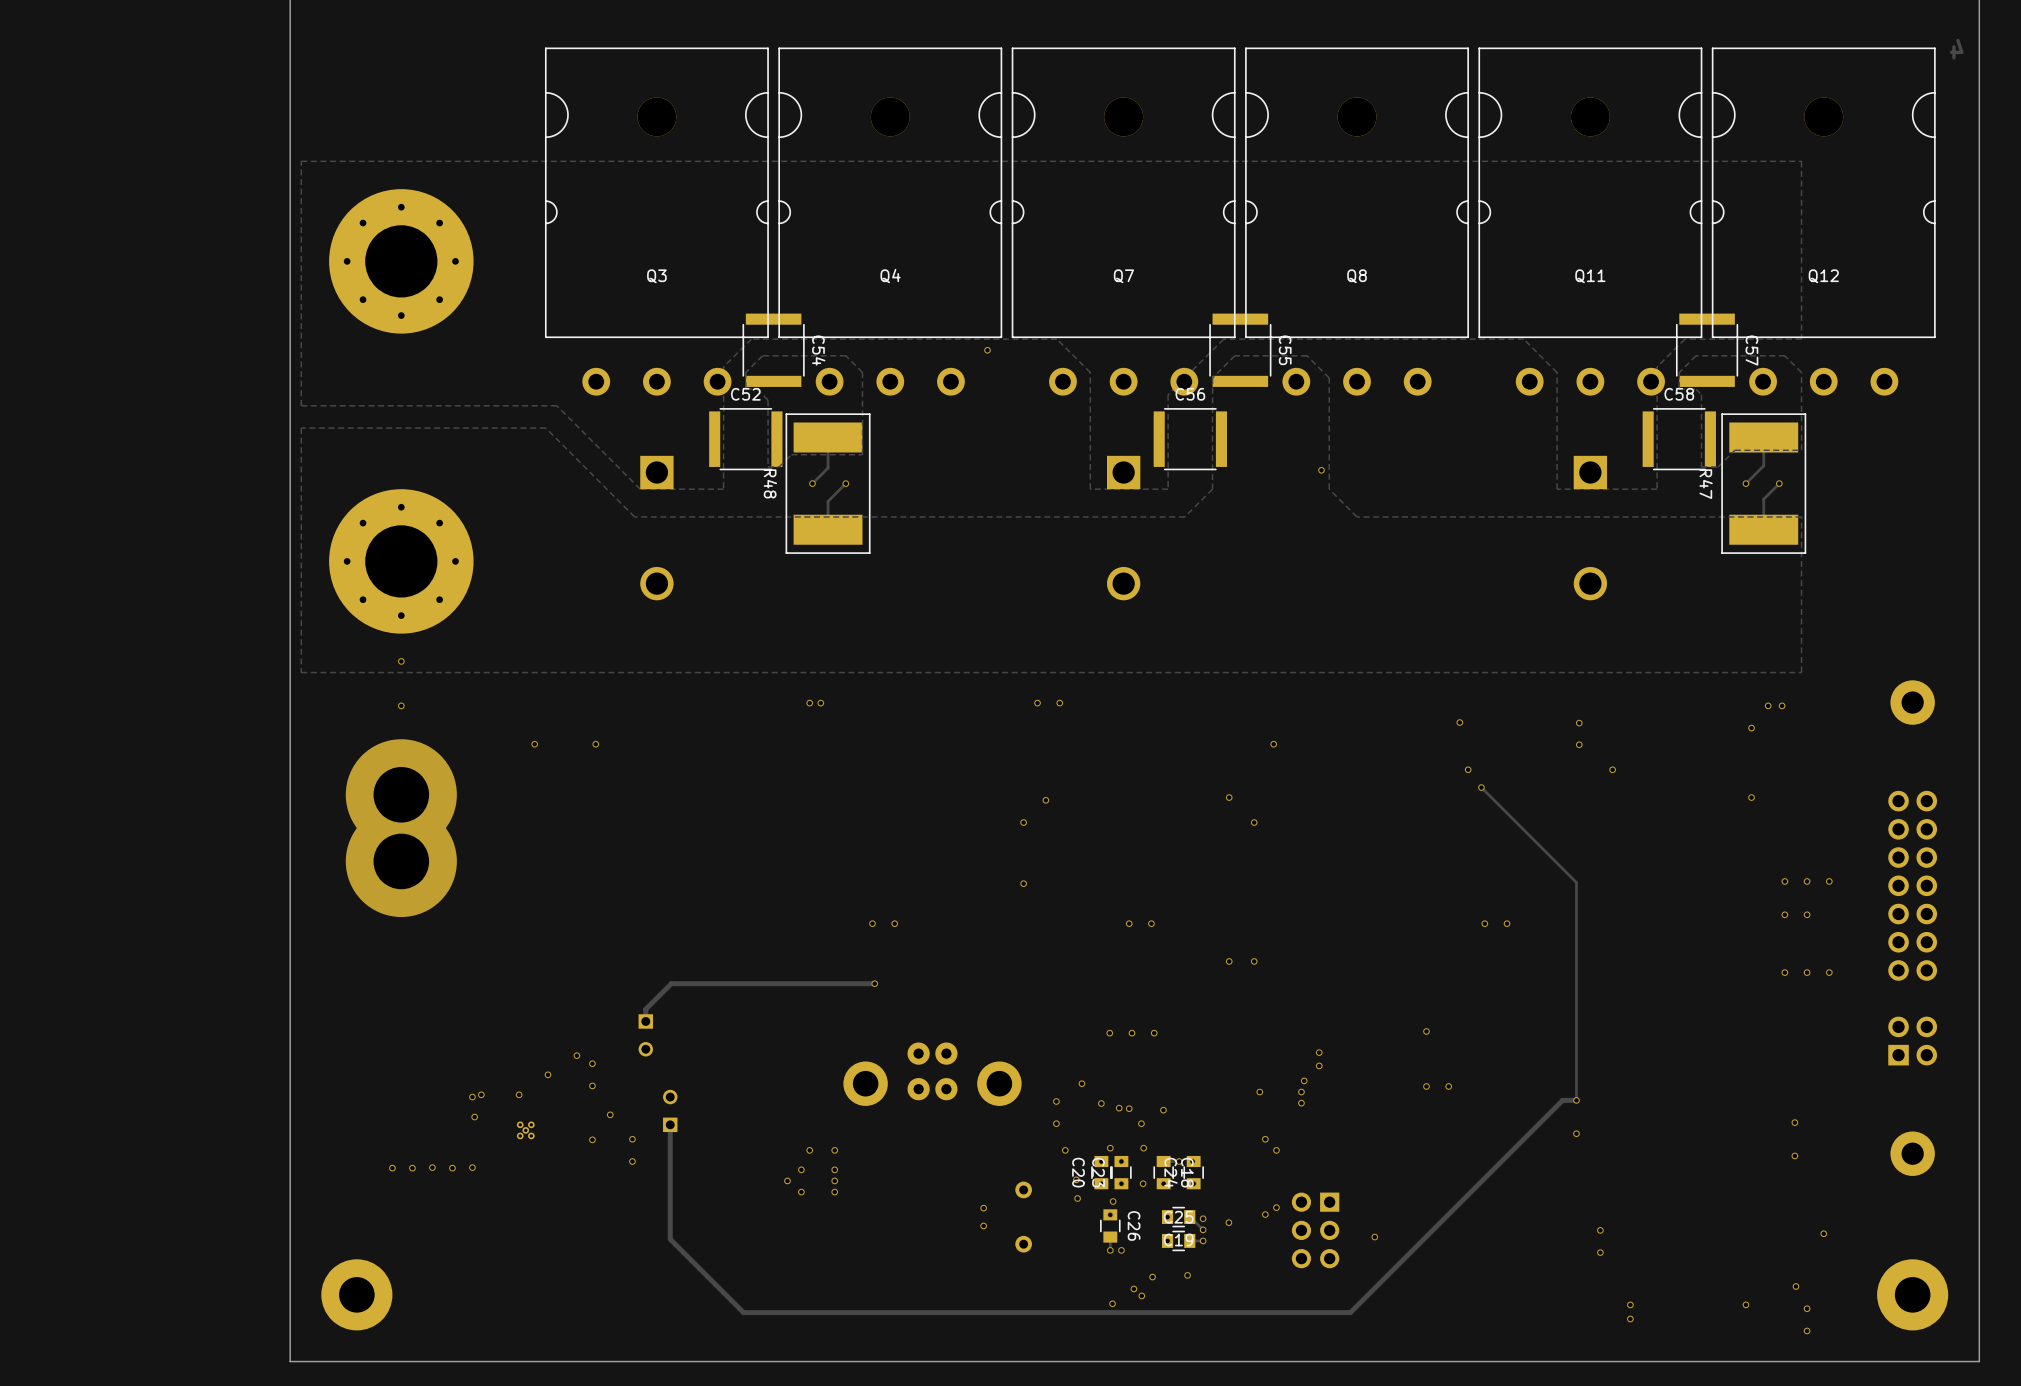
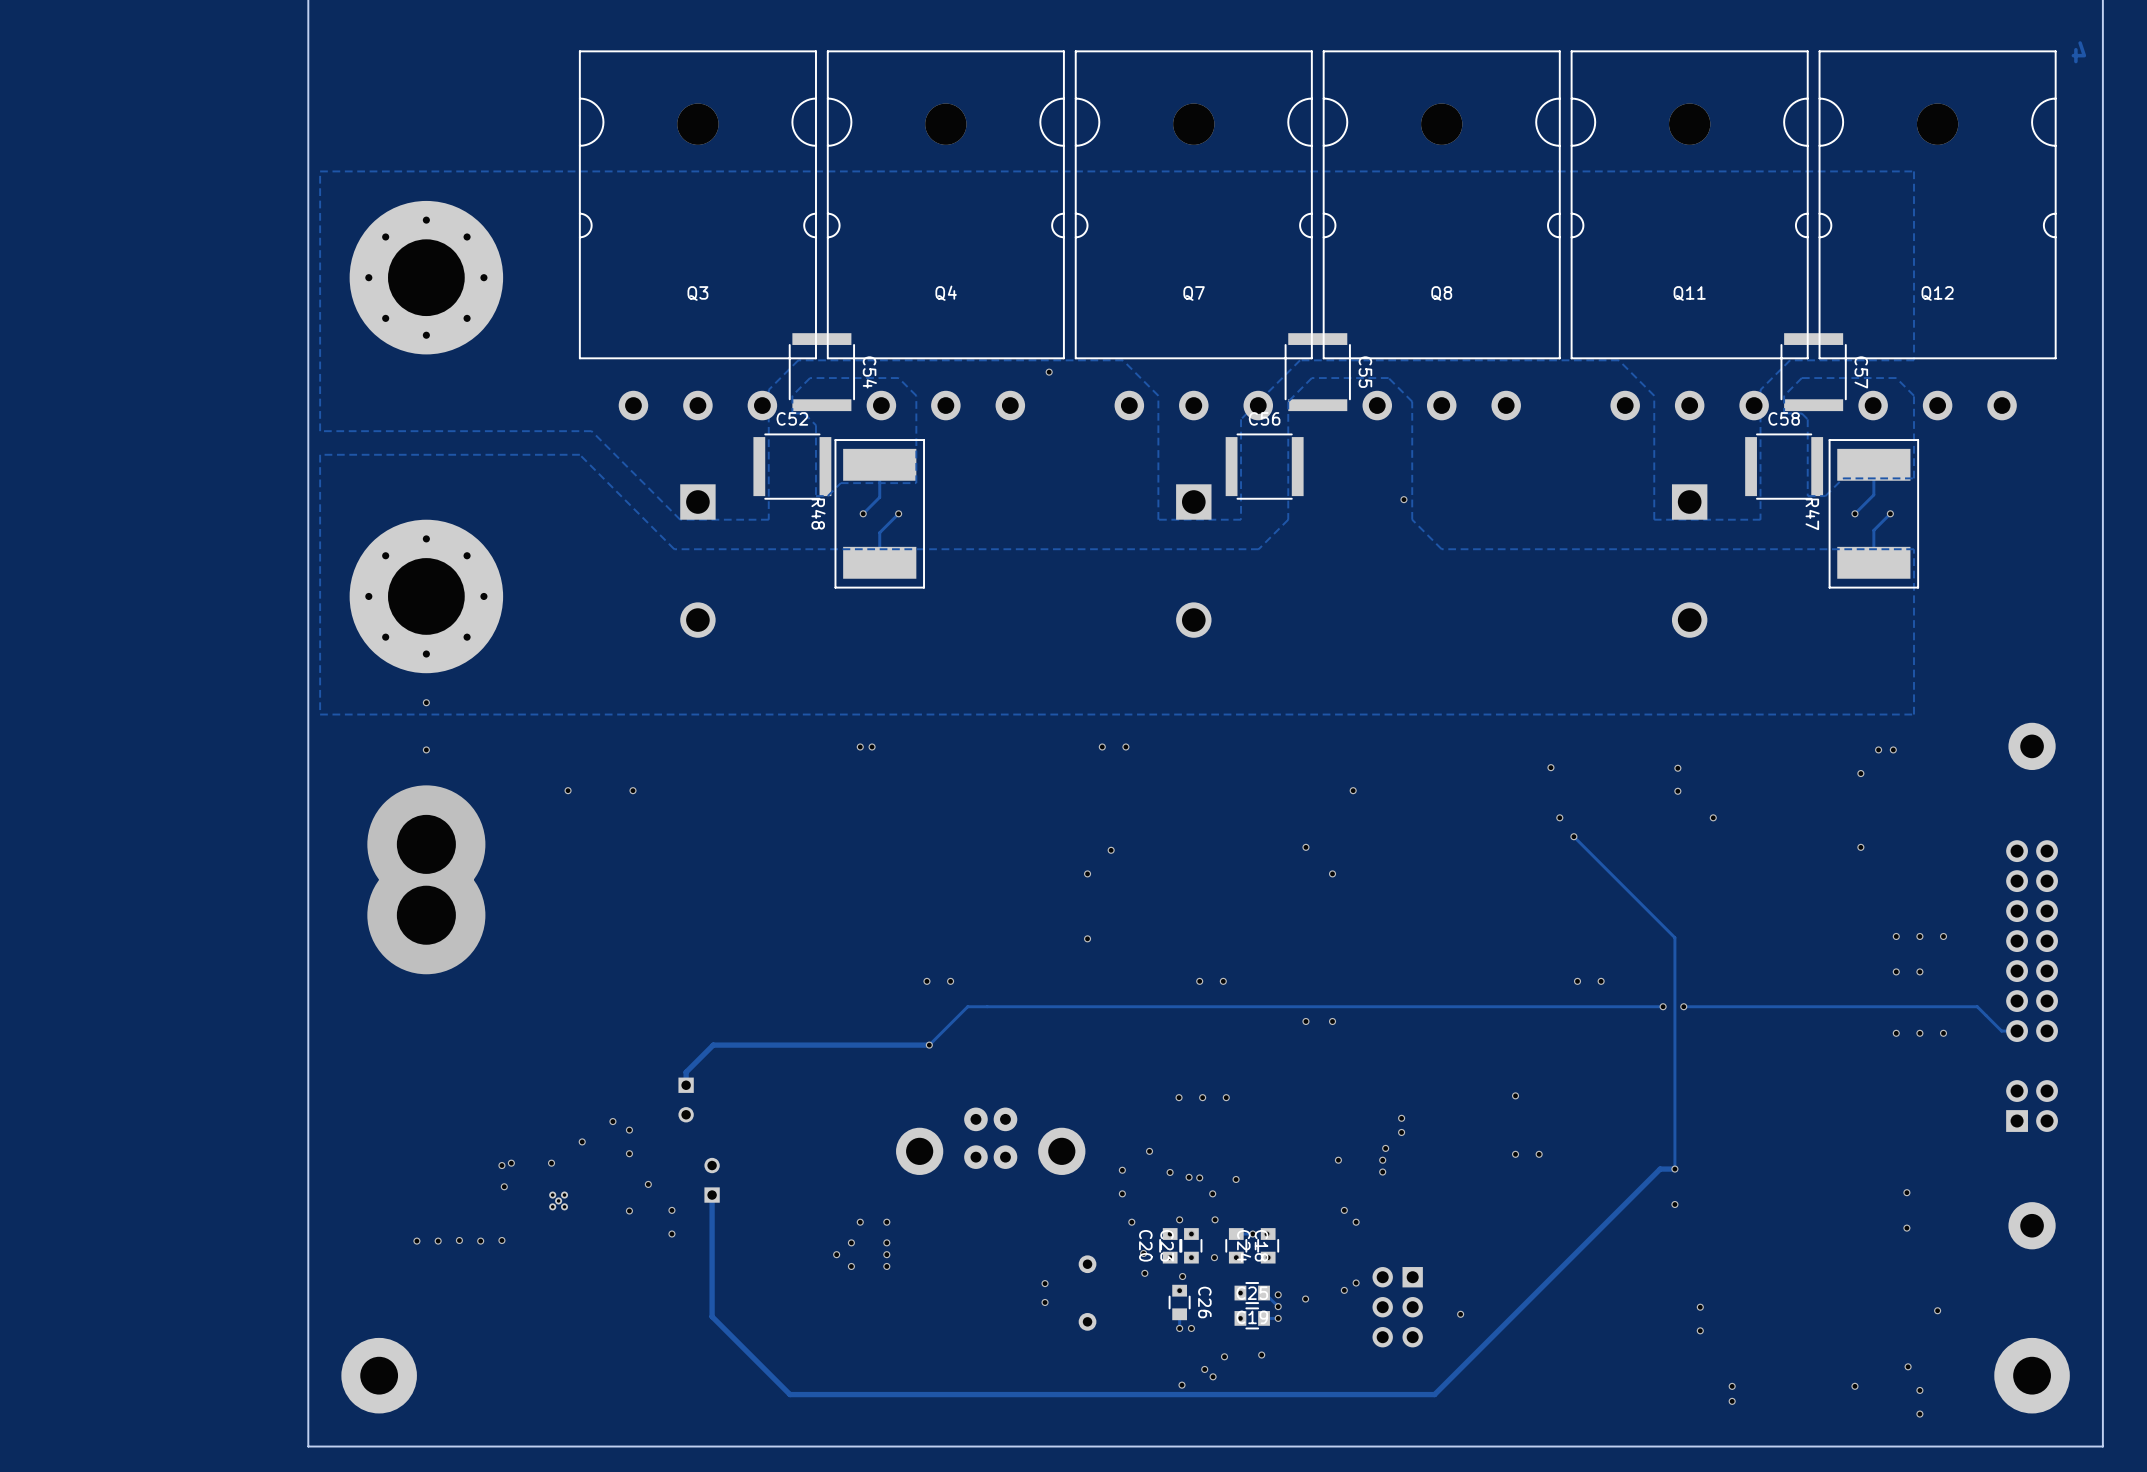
track: none -> (1663, 1006) (967, 1006) (929, 1045)
via: none -> (1663, 1006)
track: none -> (1683, 1006) (1977, 1006) (2001, 1031) (2017, 1031)
via: none -> (1683, 1006)

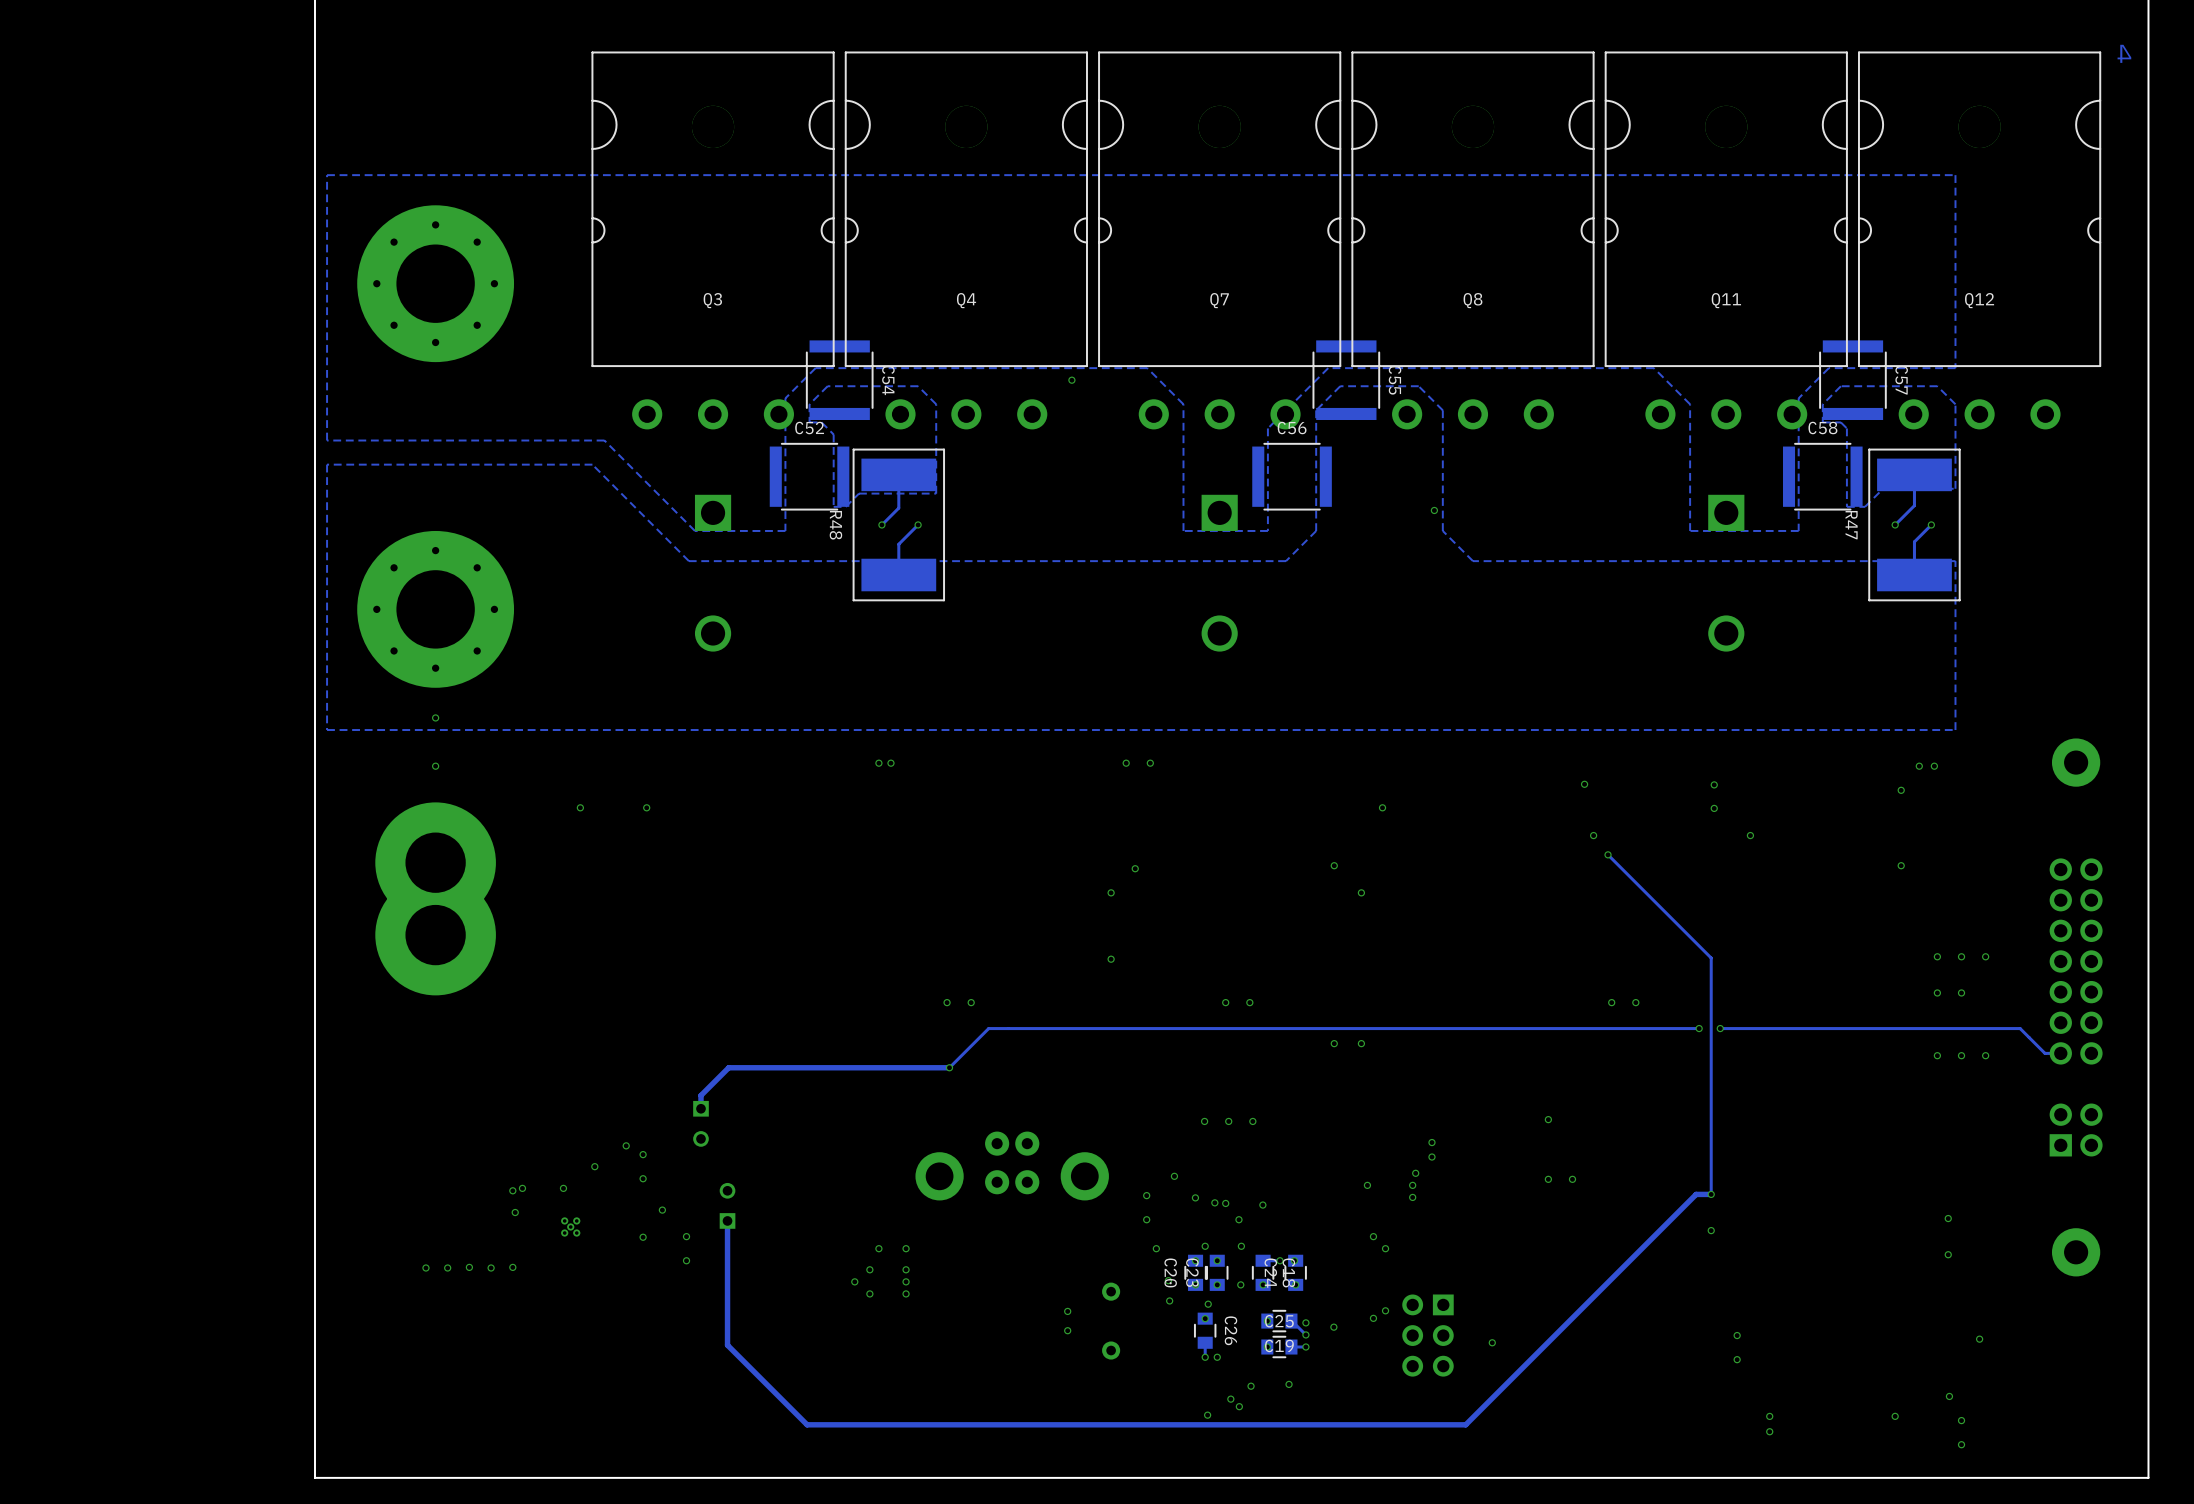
part: (379, 1375) -> none
part: (2032, 1375) -> none

